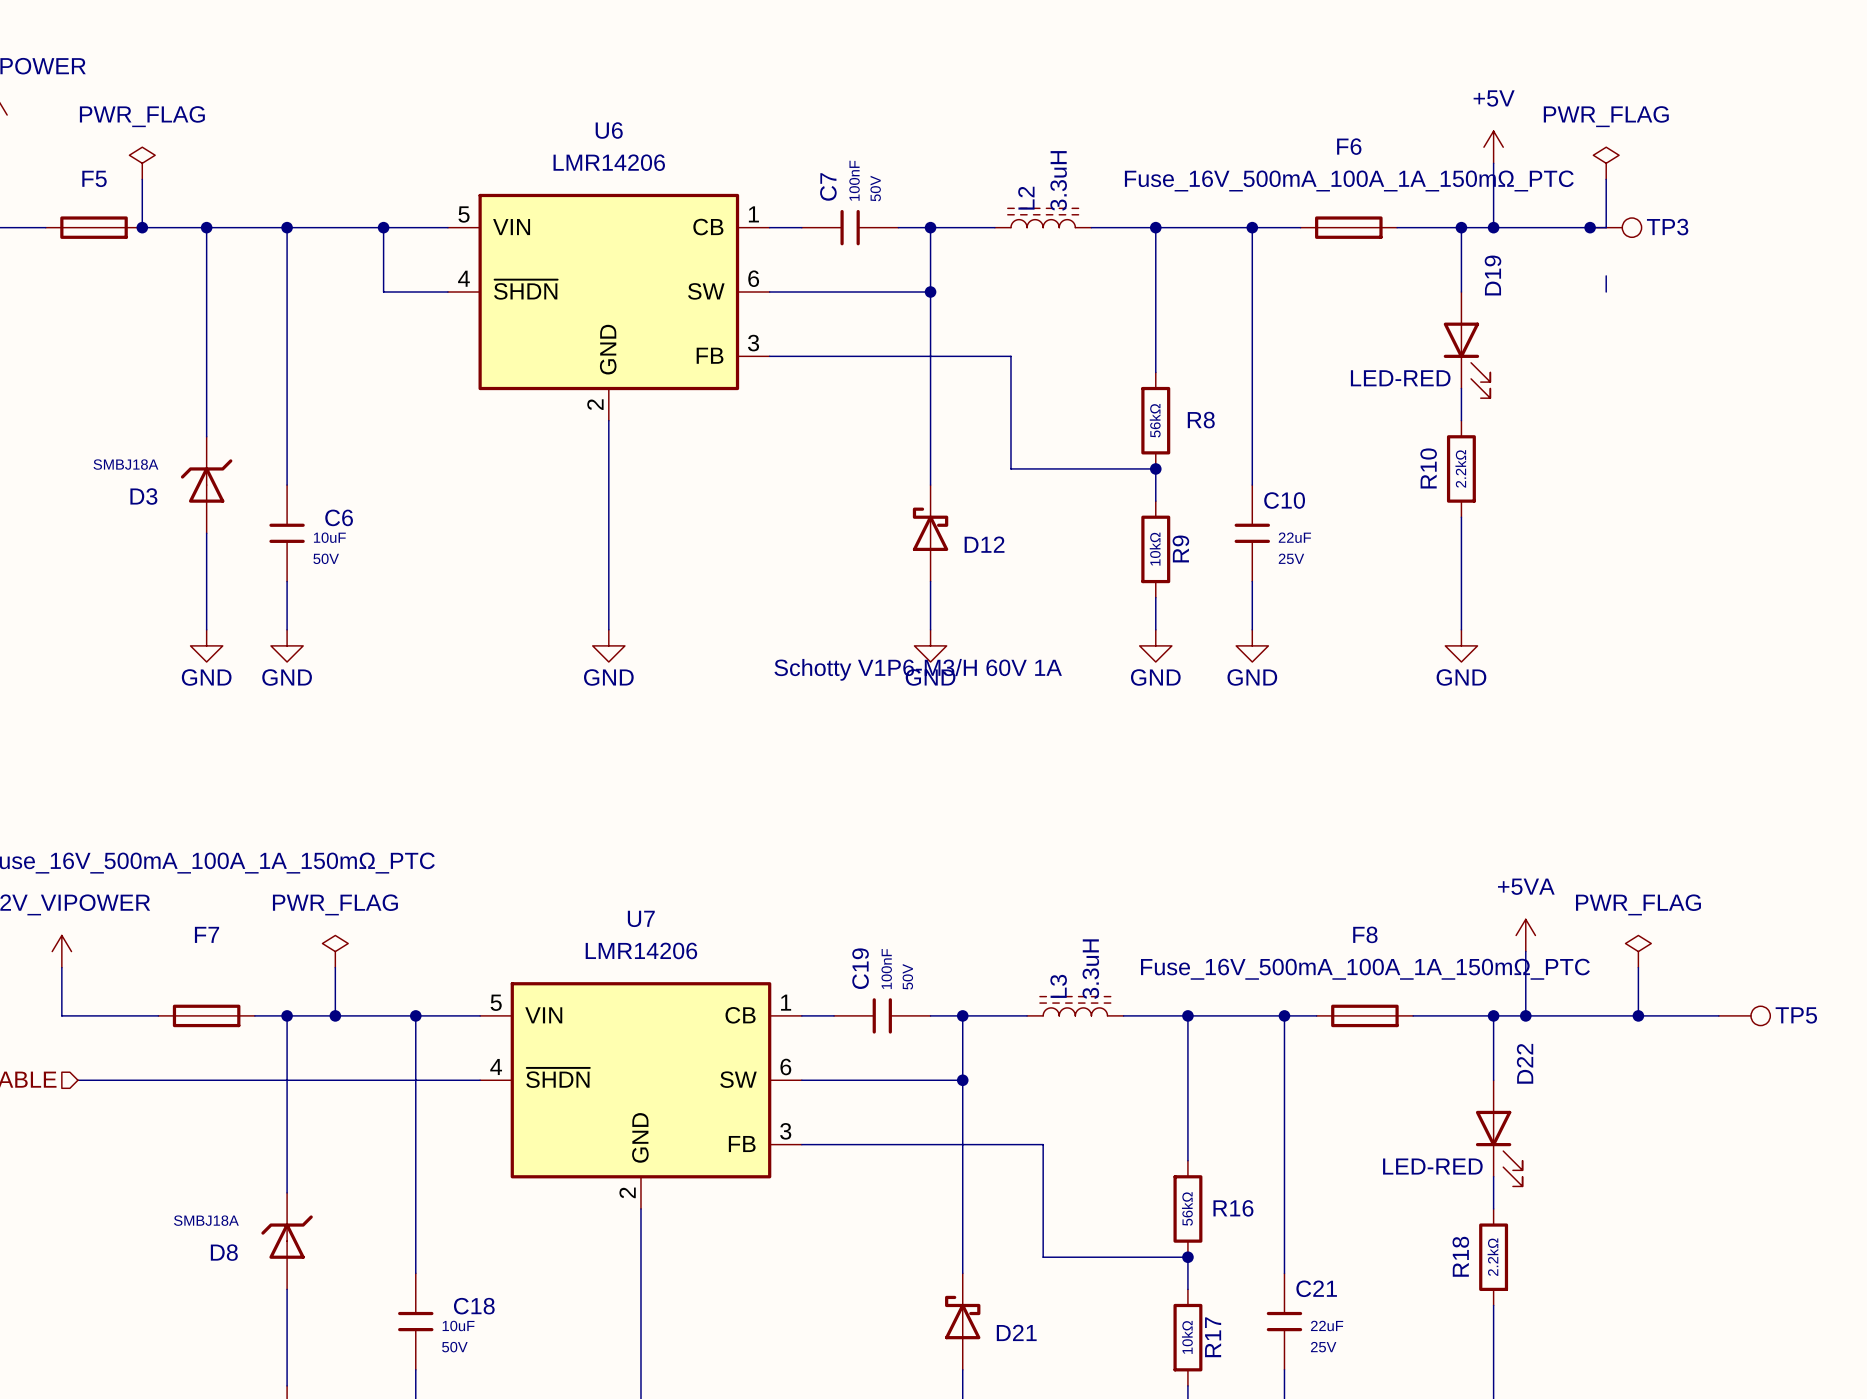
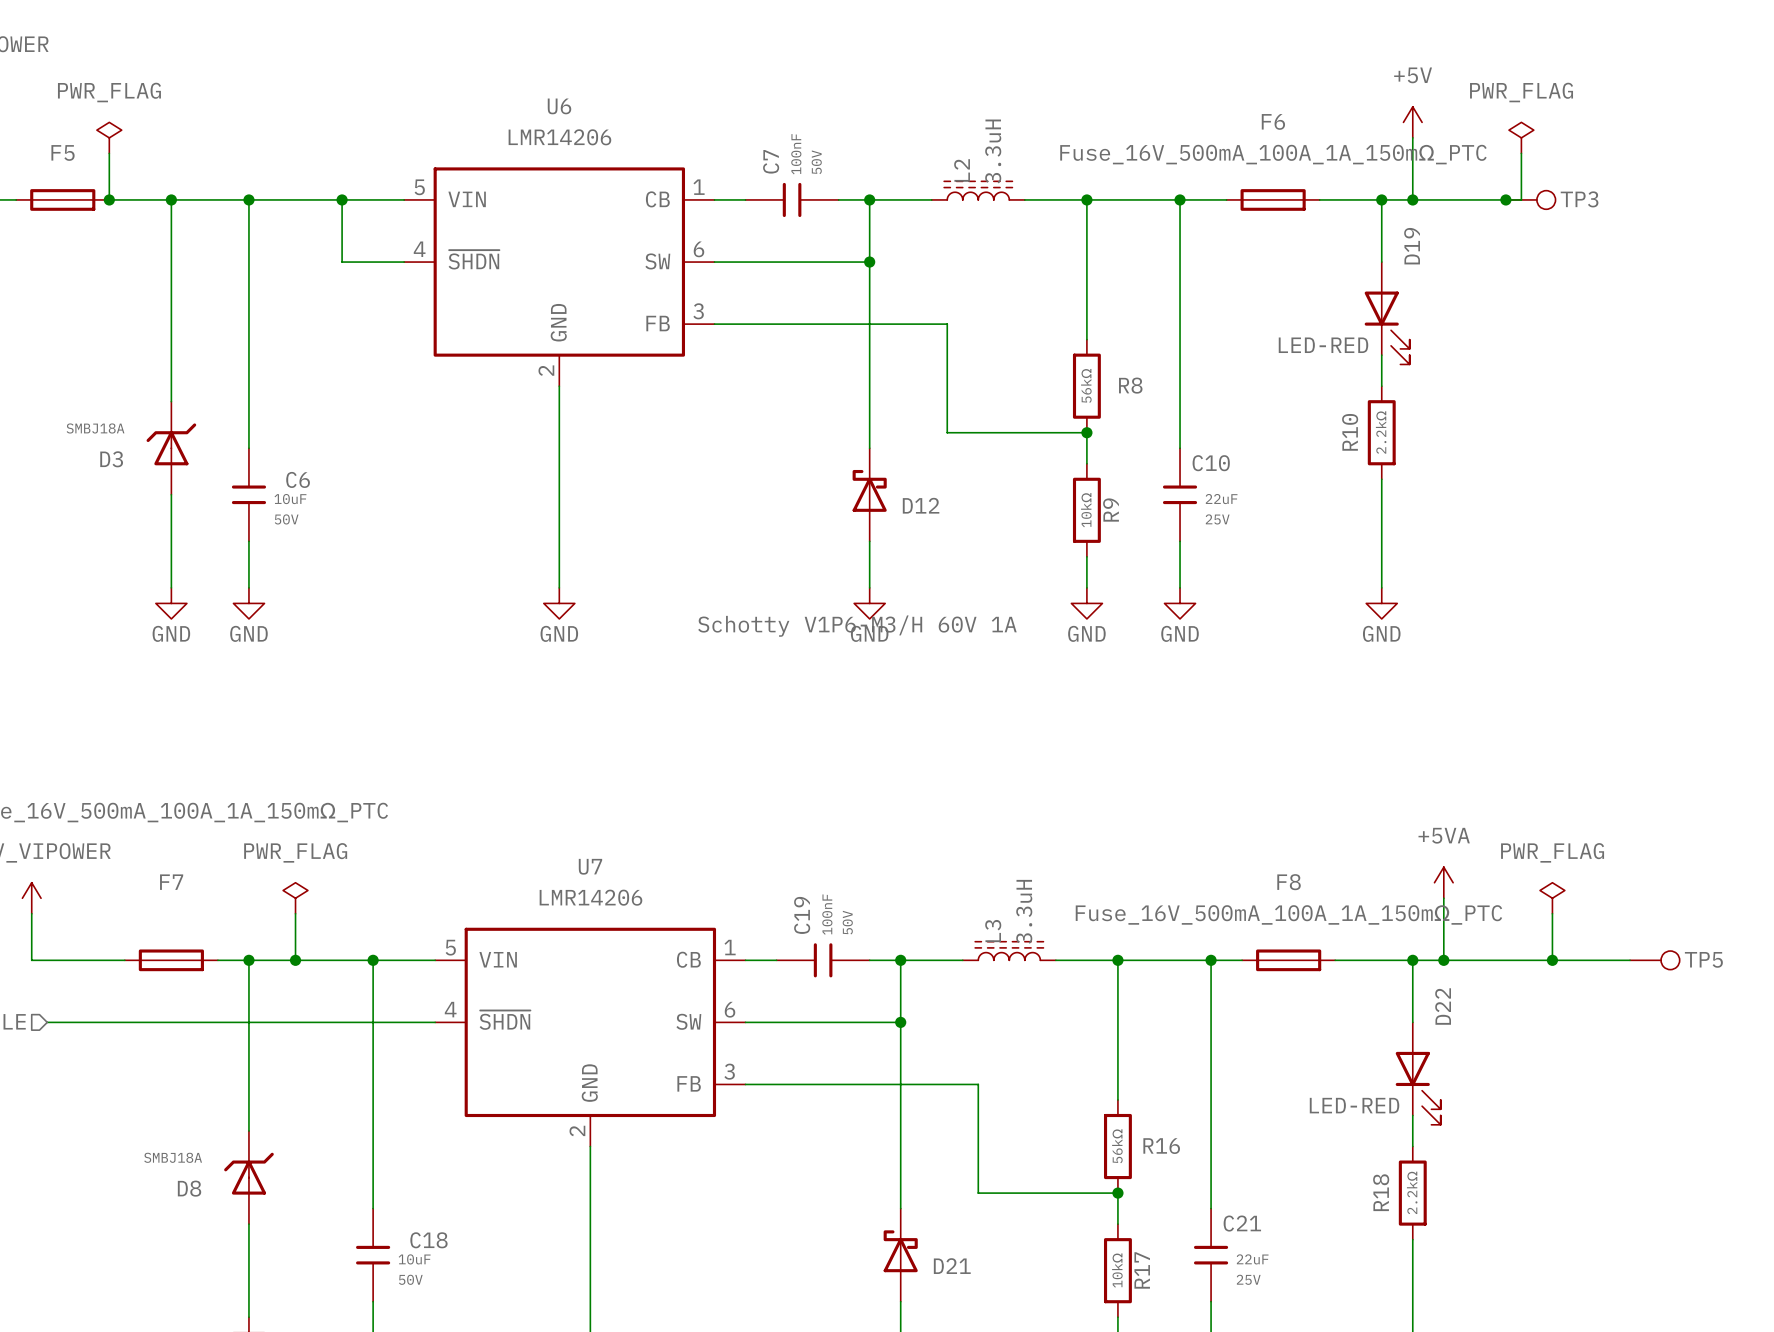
wire: (1606, 275) (1606, 292) -> none

